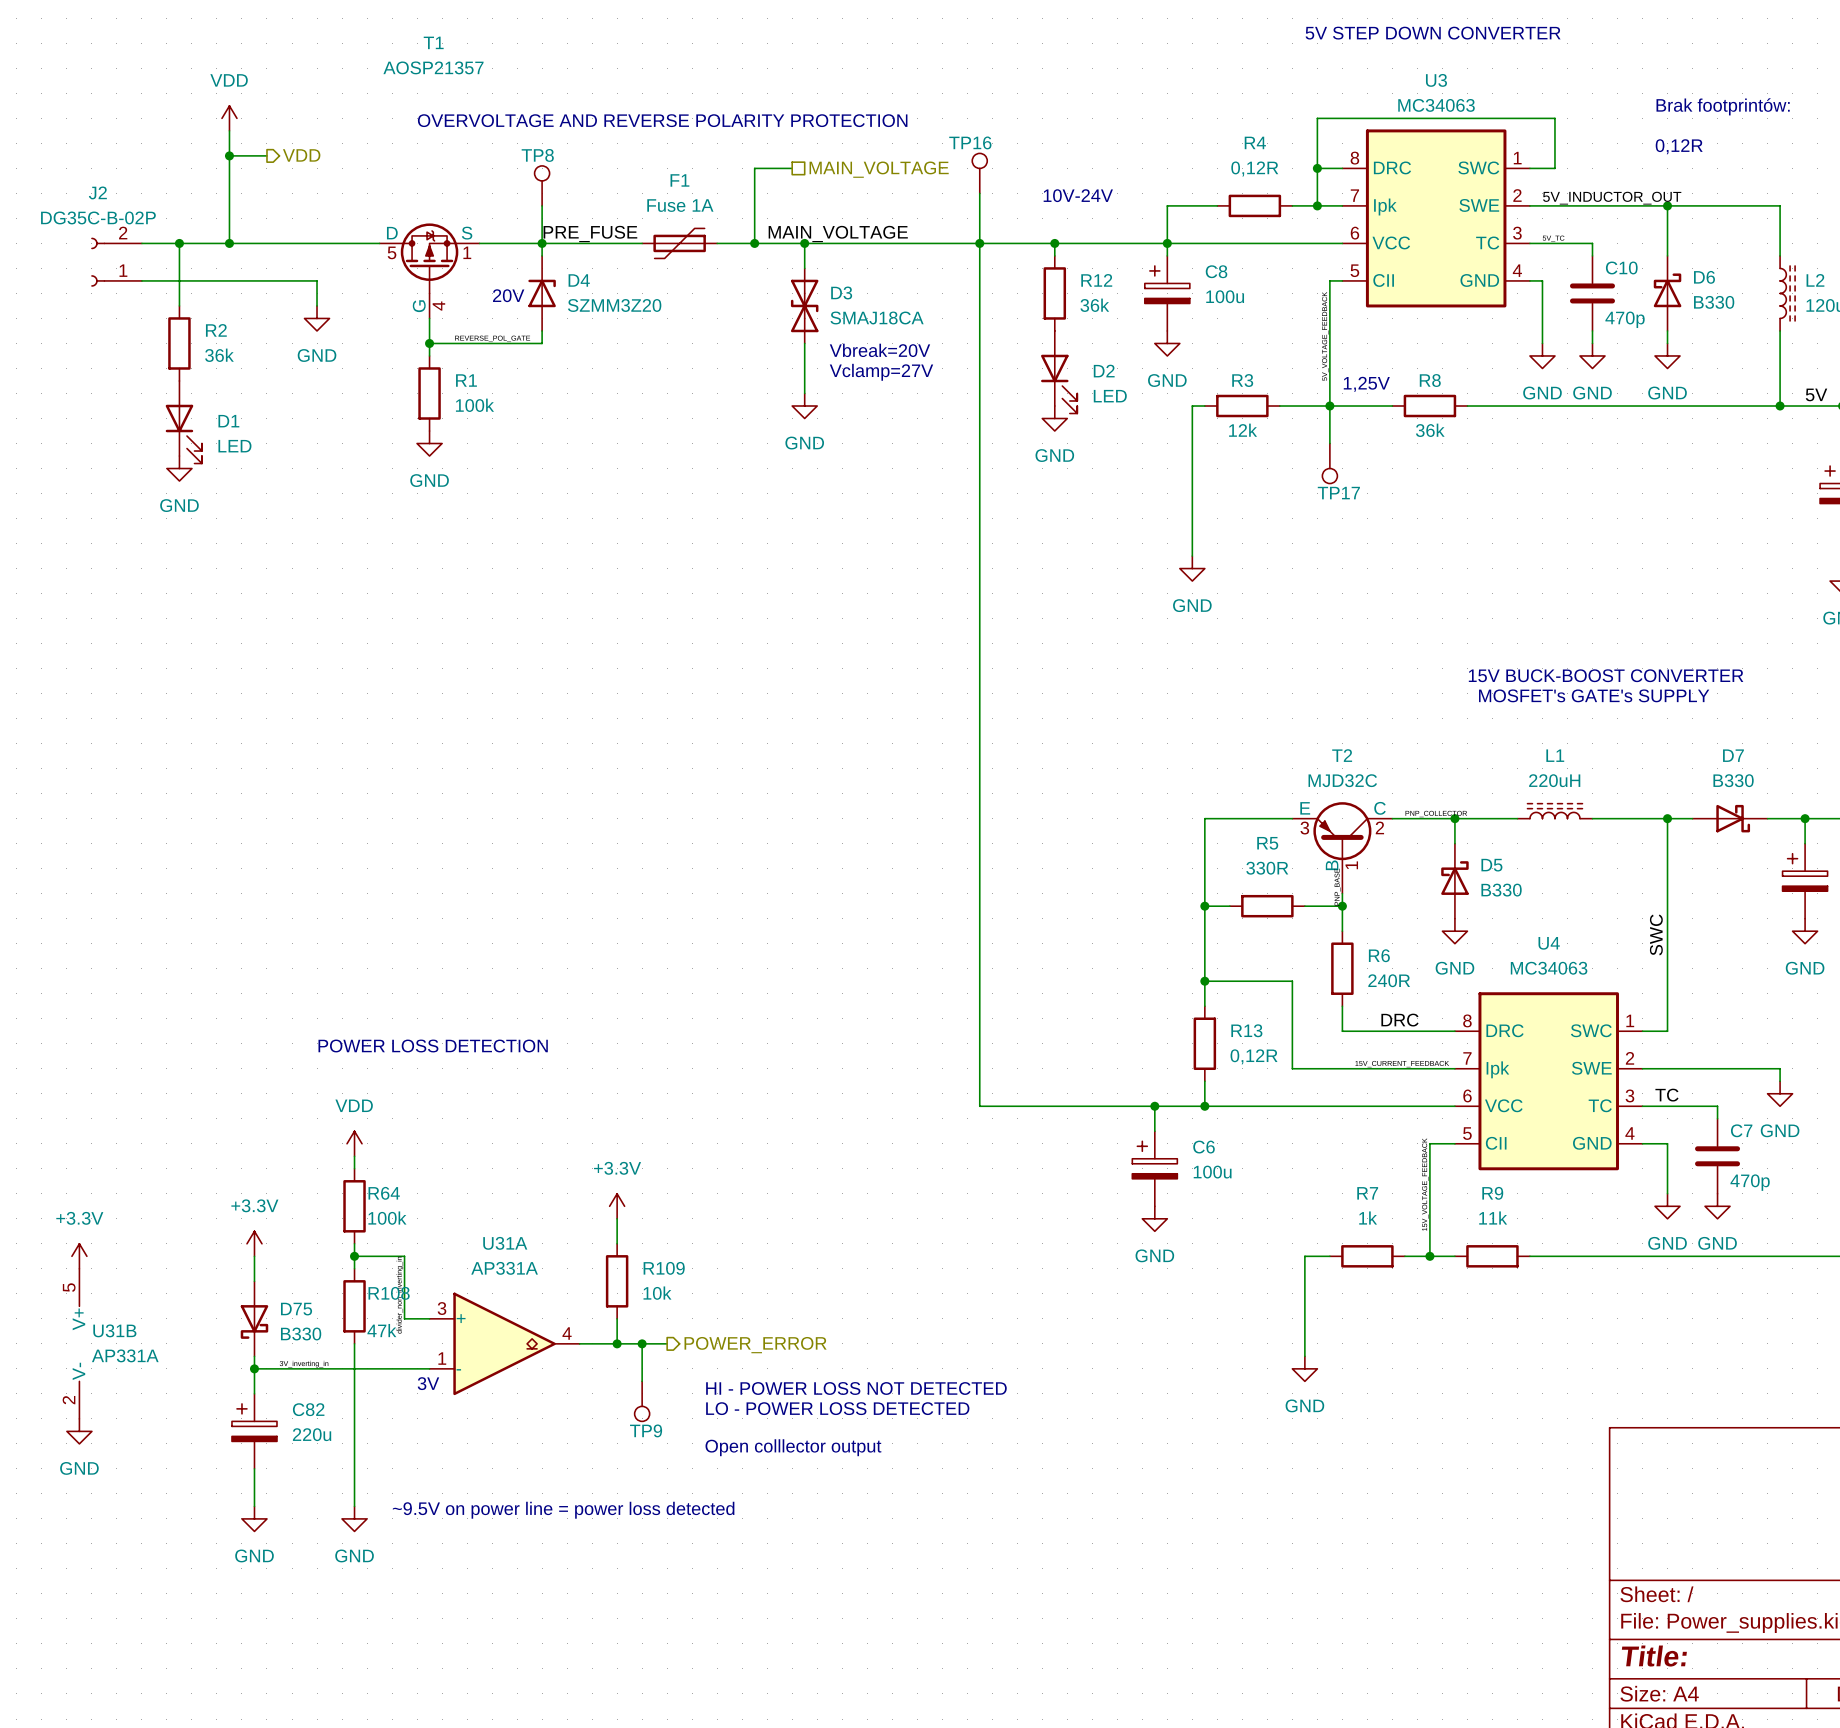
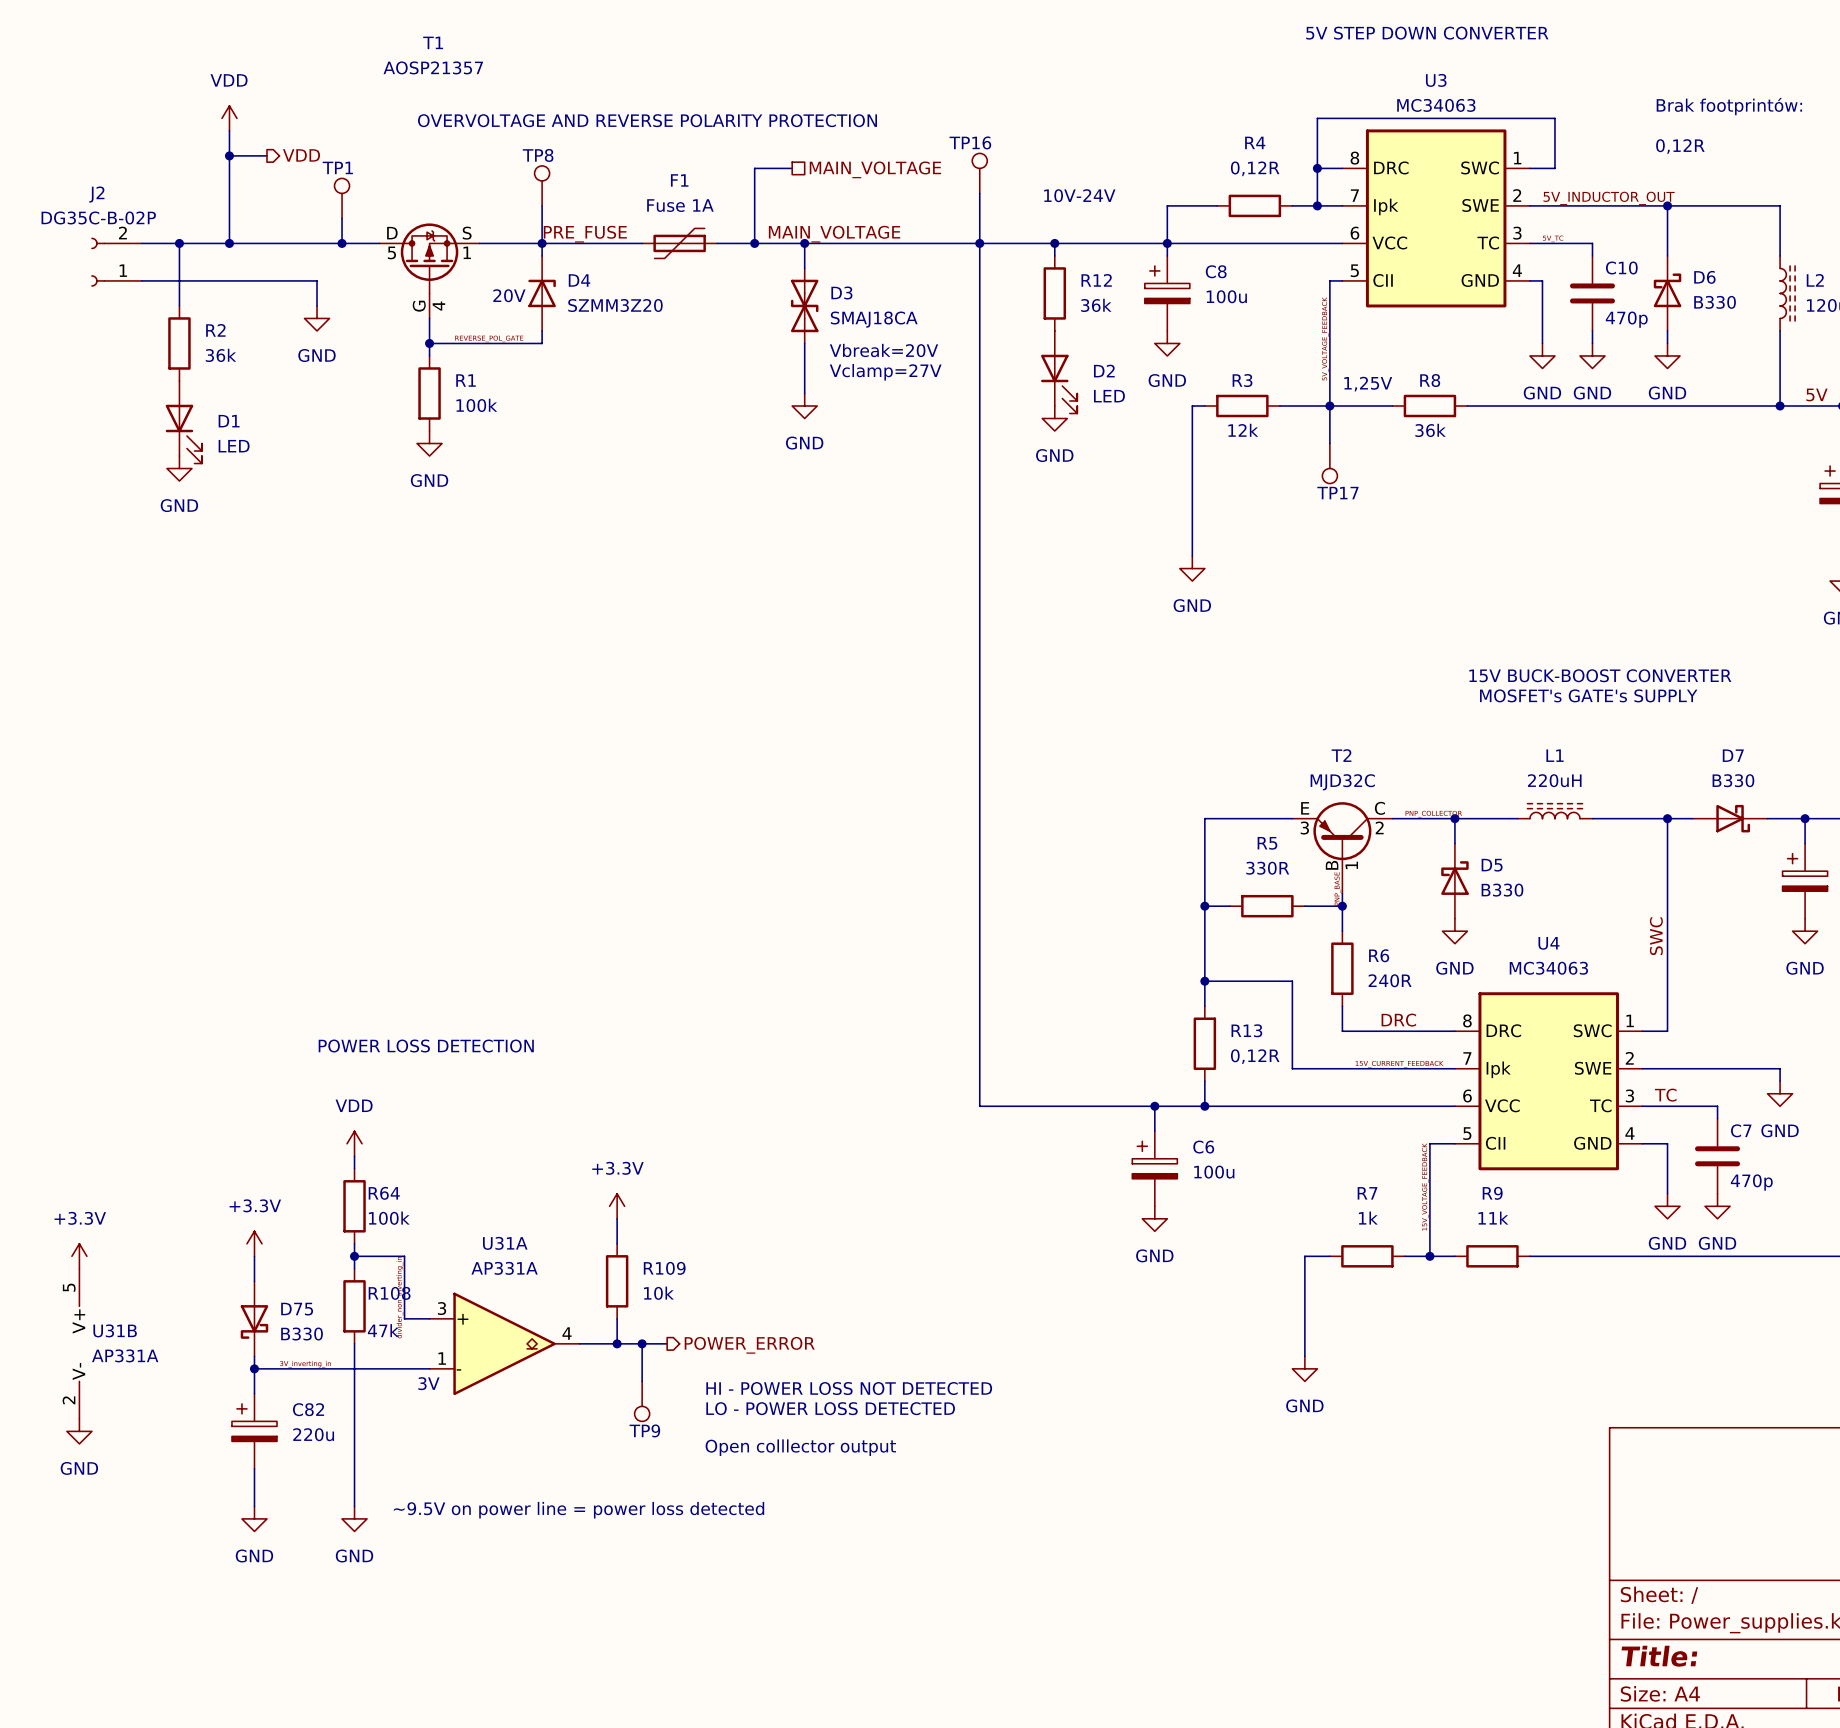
TP1: none -> (342, 198)
wire: none -> (342, 218) (342, 243)
junction: none -> (342, 243)

